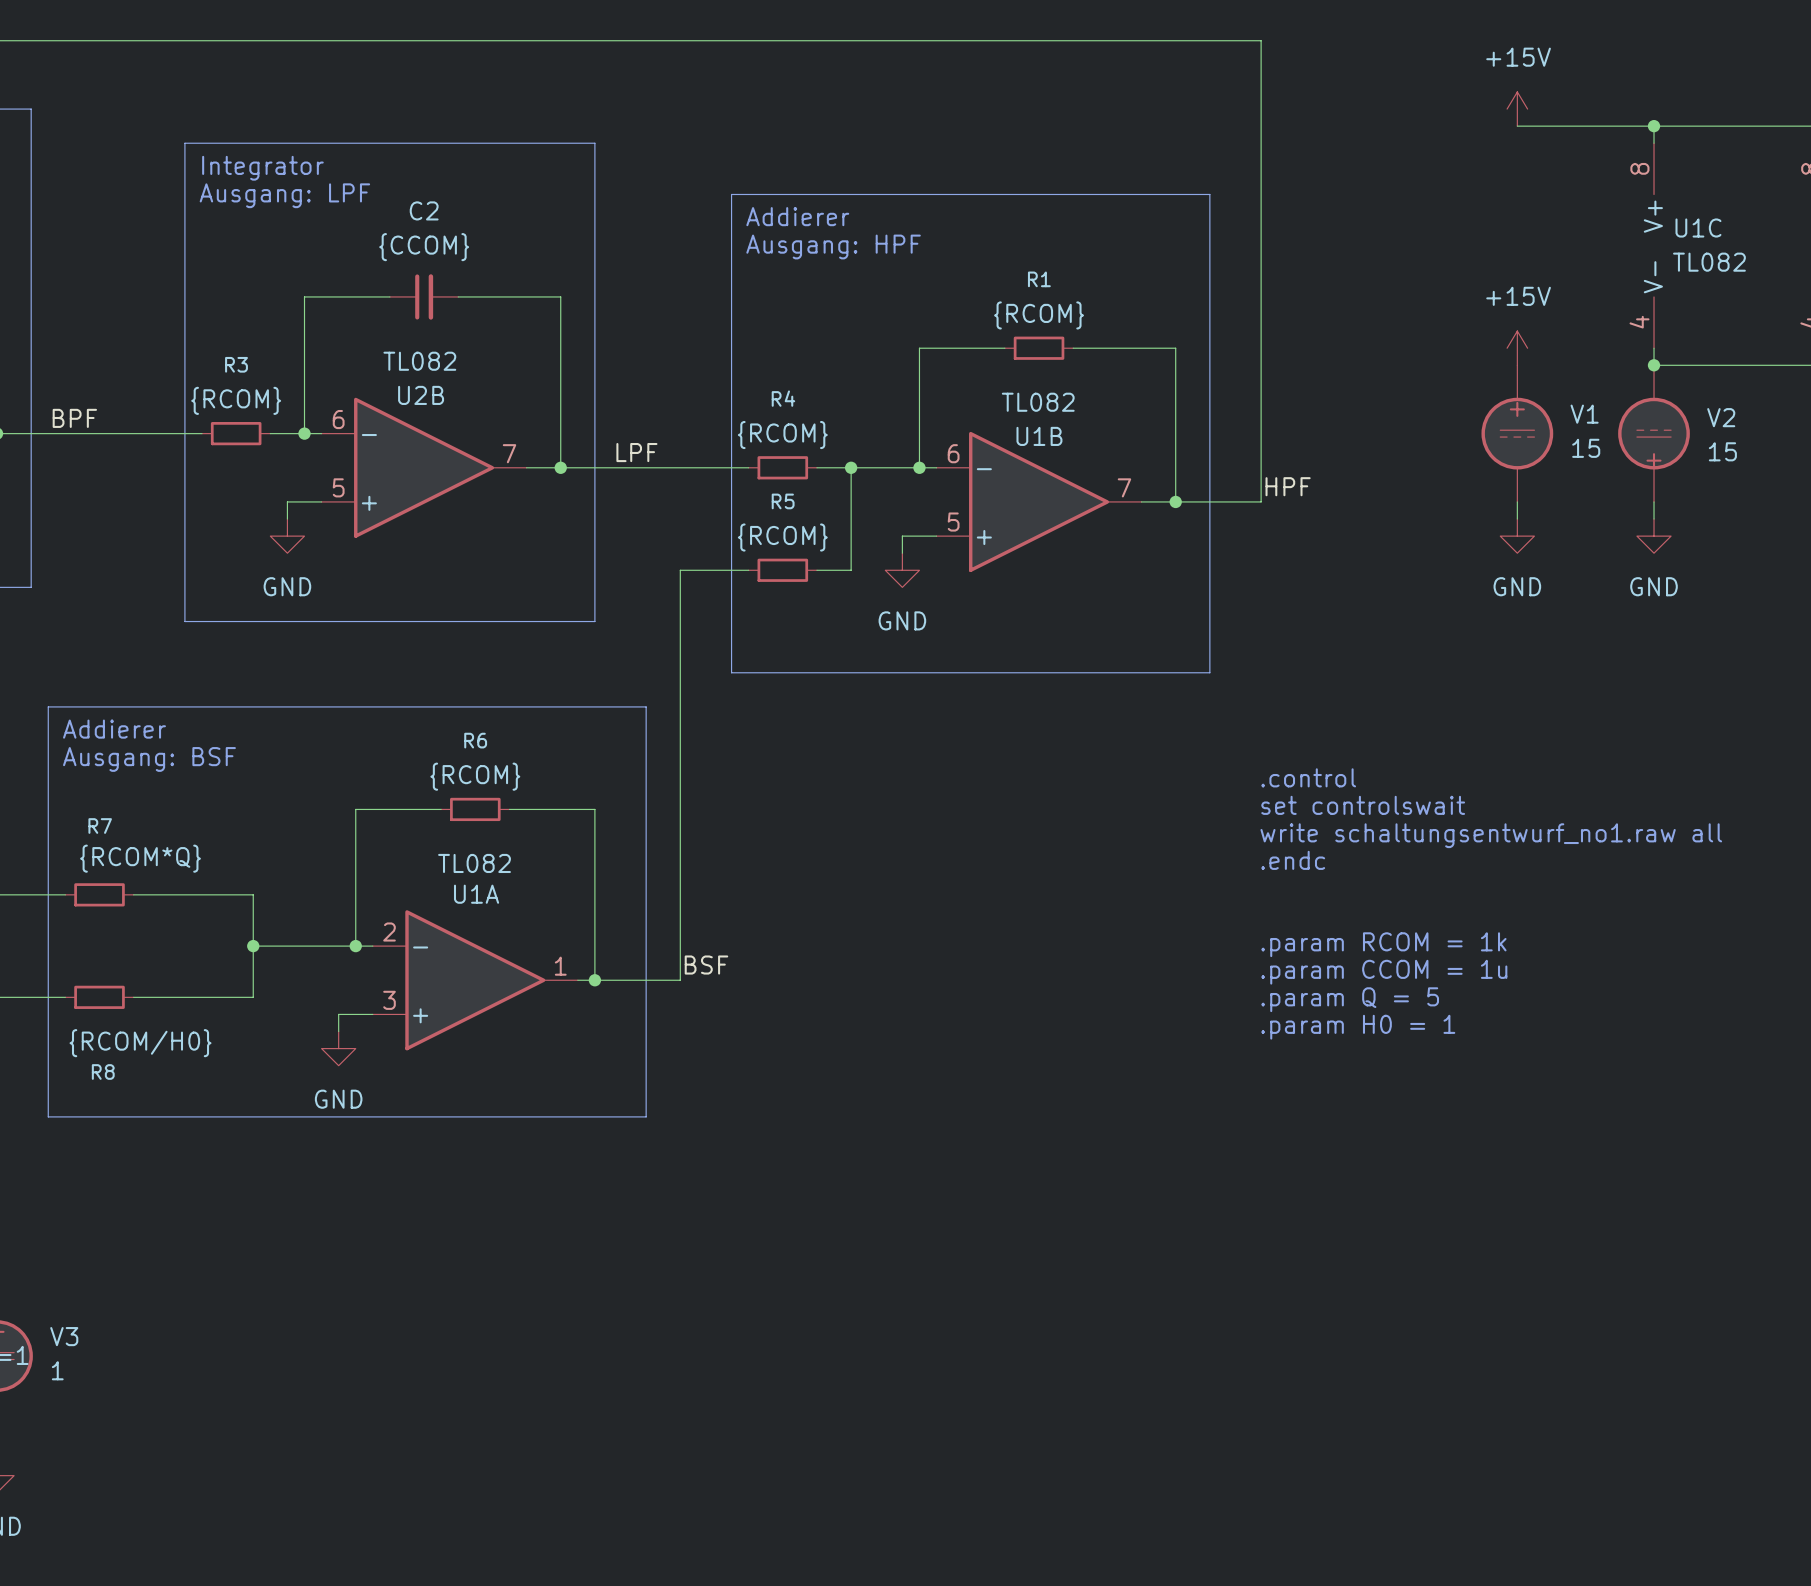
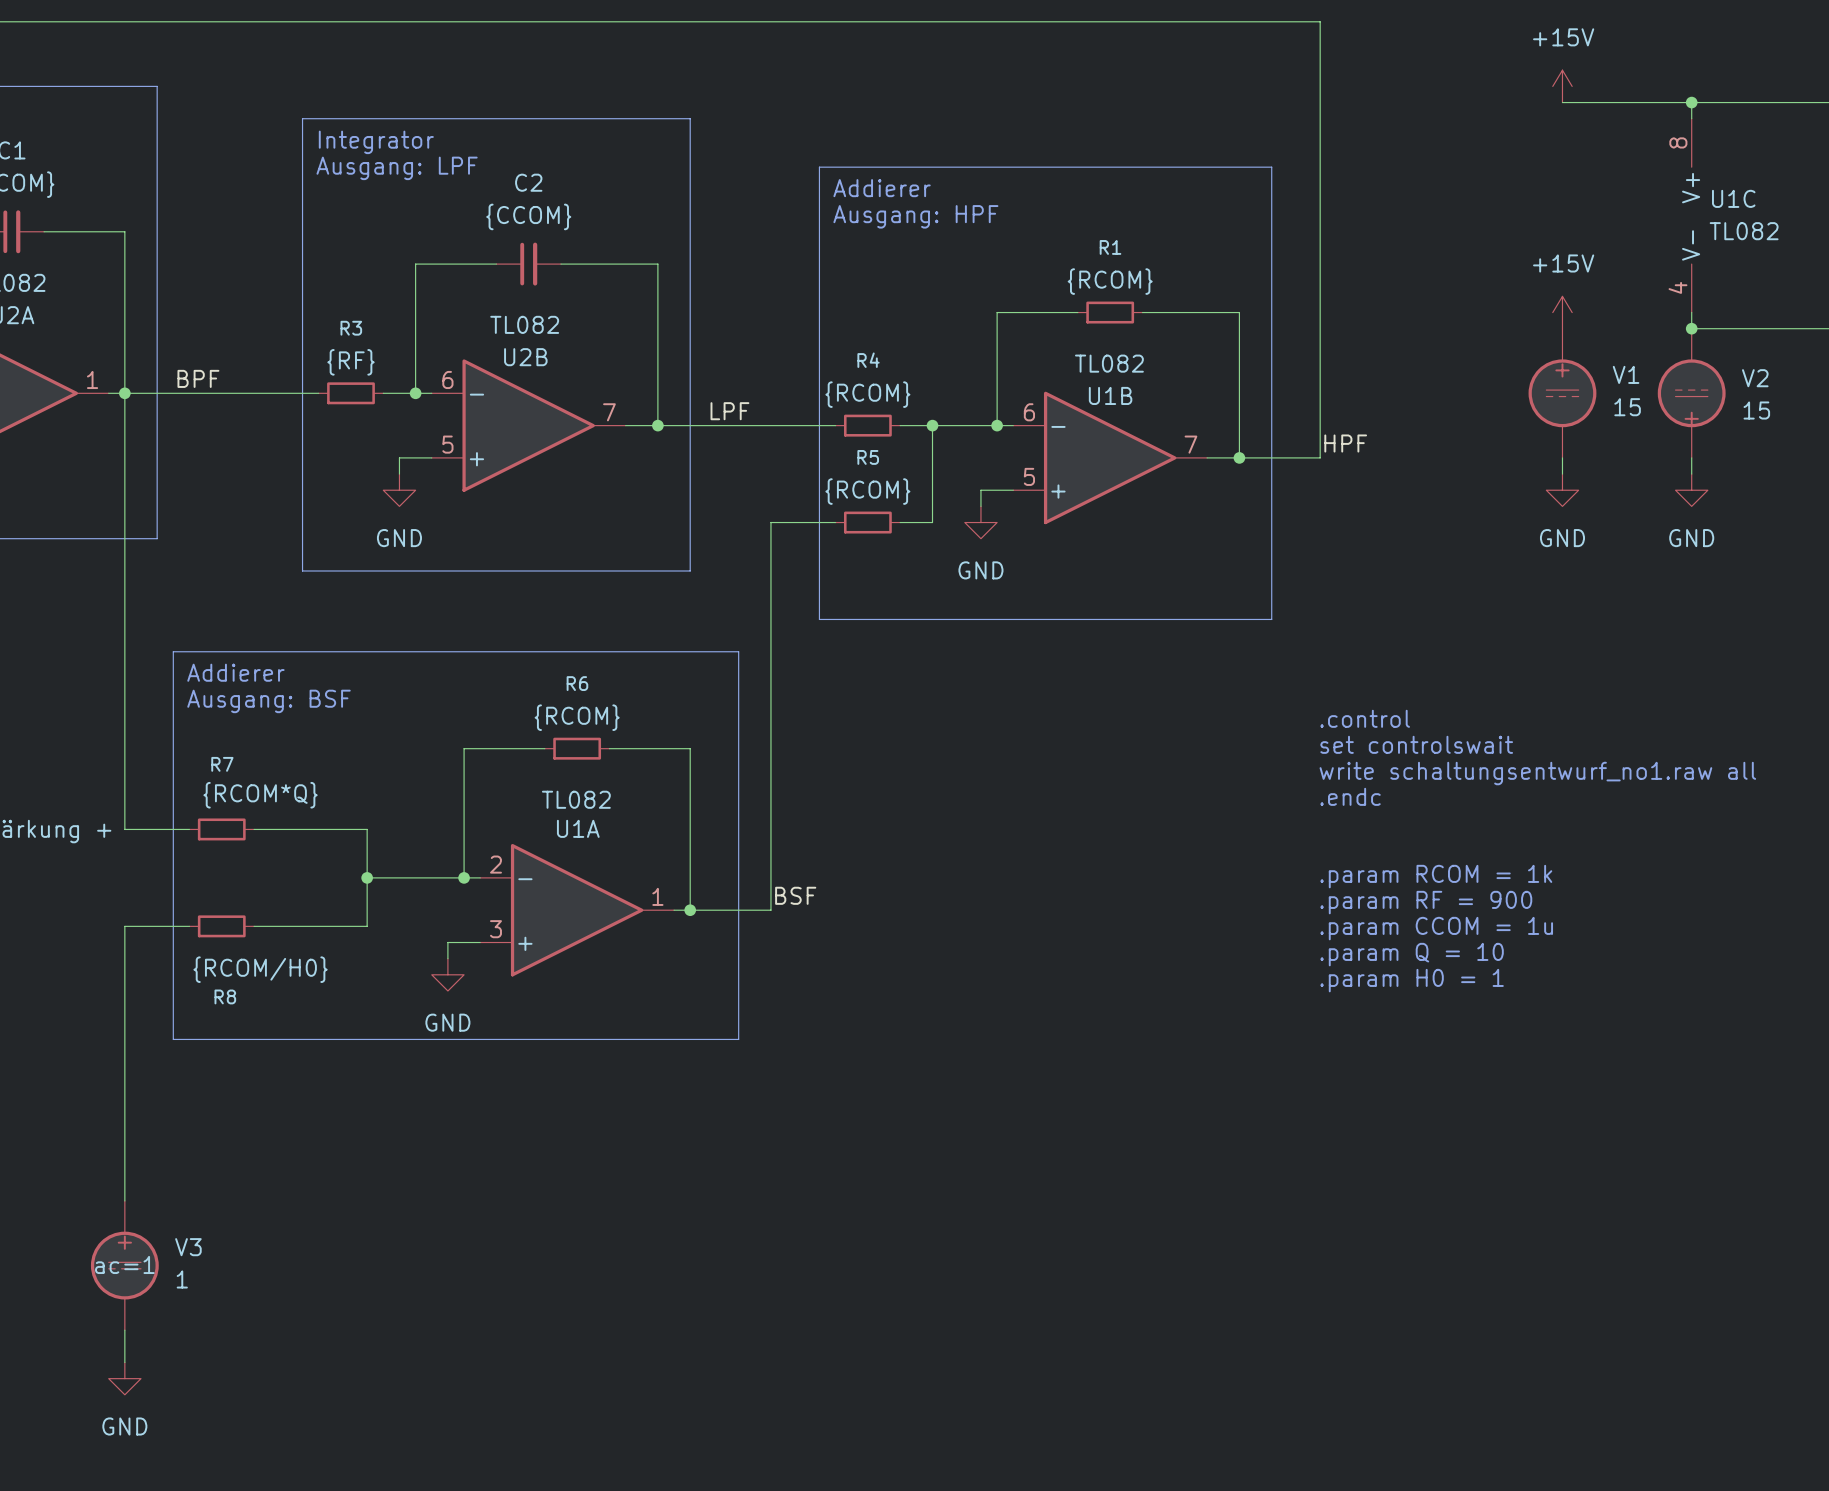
R3 value: {RCOM} (236, 400) -> {RF} (350, 362)
text: .param CCOM = 1u (1384, 972) -> .param RF = 900 (1426, 902)
text: .param Q = 5 (1350, 999) -> .param CCOM = 1u (1436, 928)
text: .param H0 = 1 (1358, 1027) -> .param Q = 10 (1412, 954)
text: none -> .param H0 = 1 (1412, 980)

